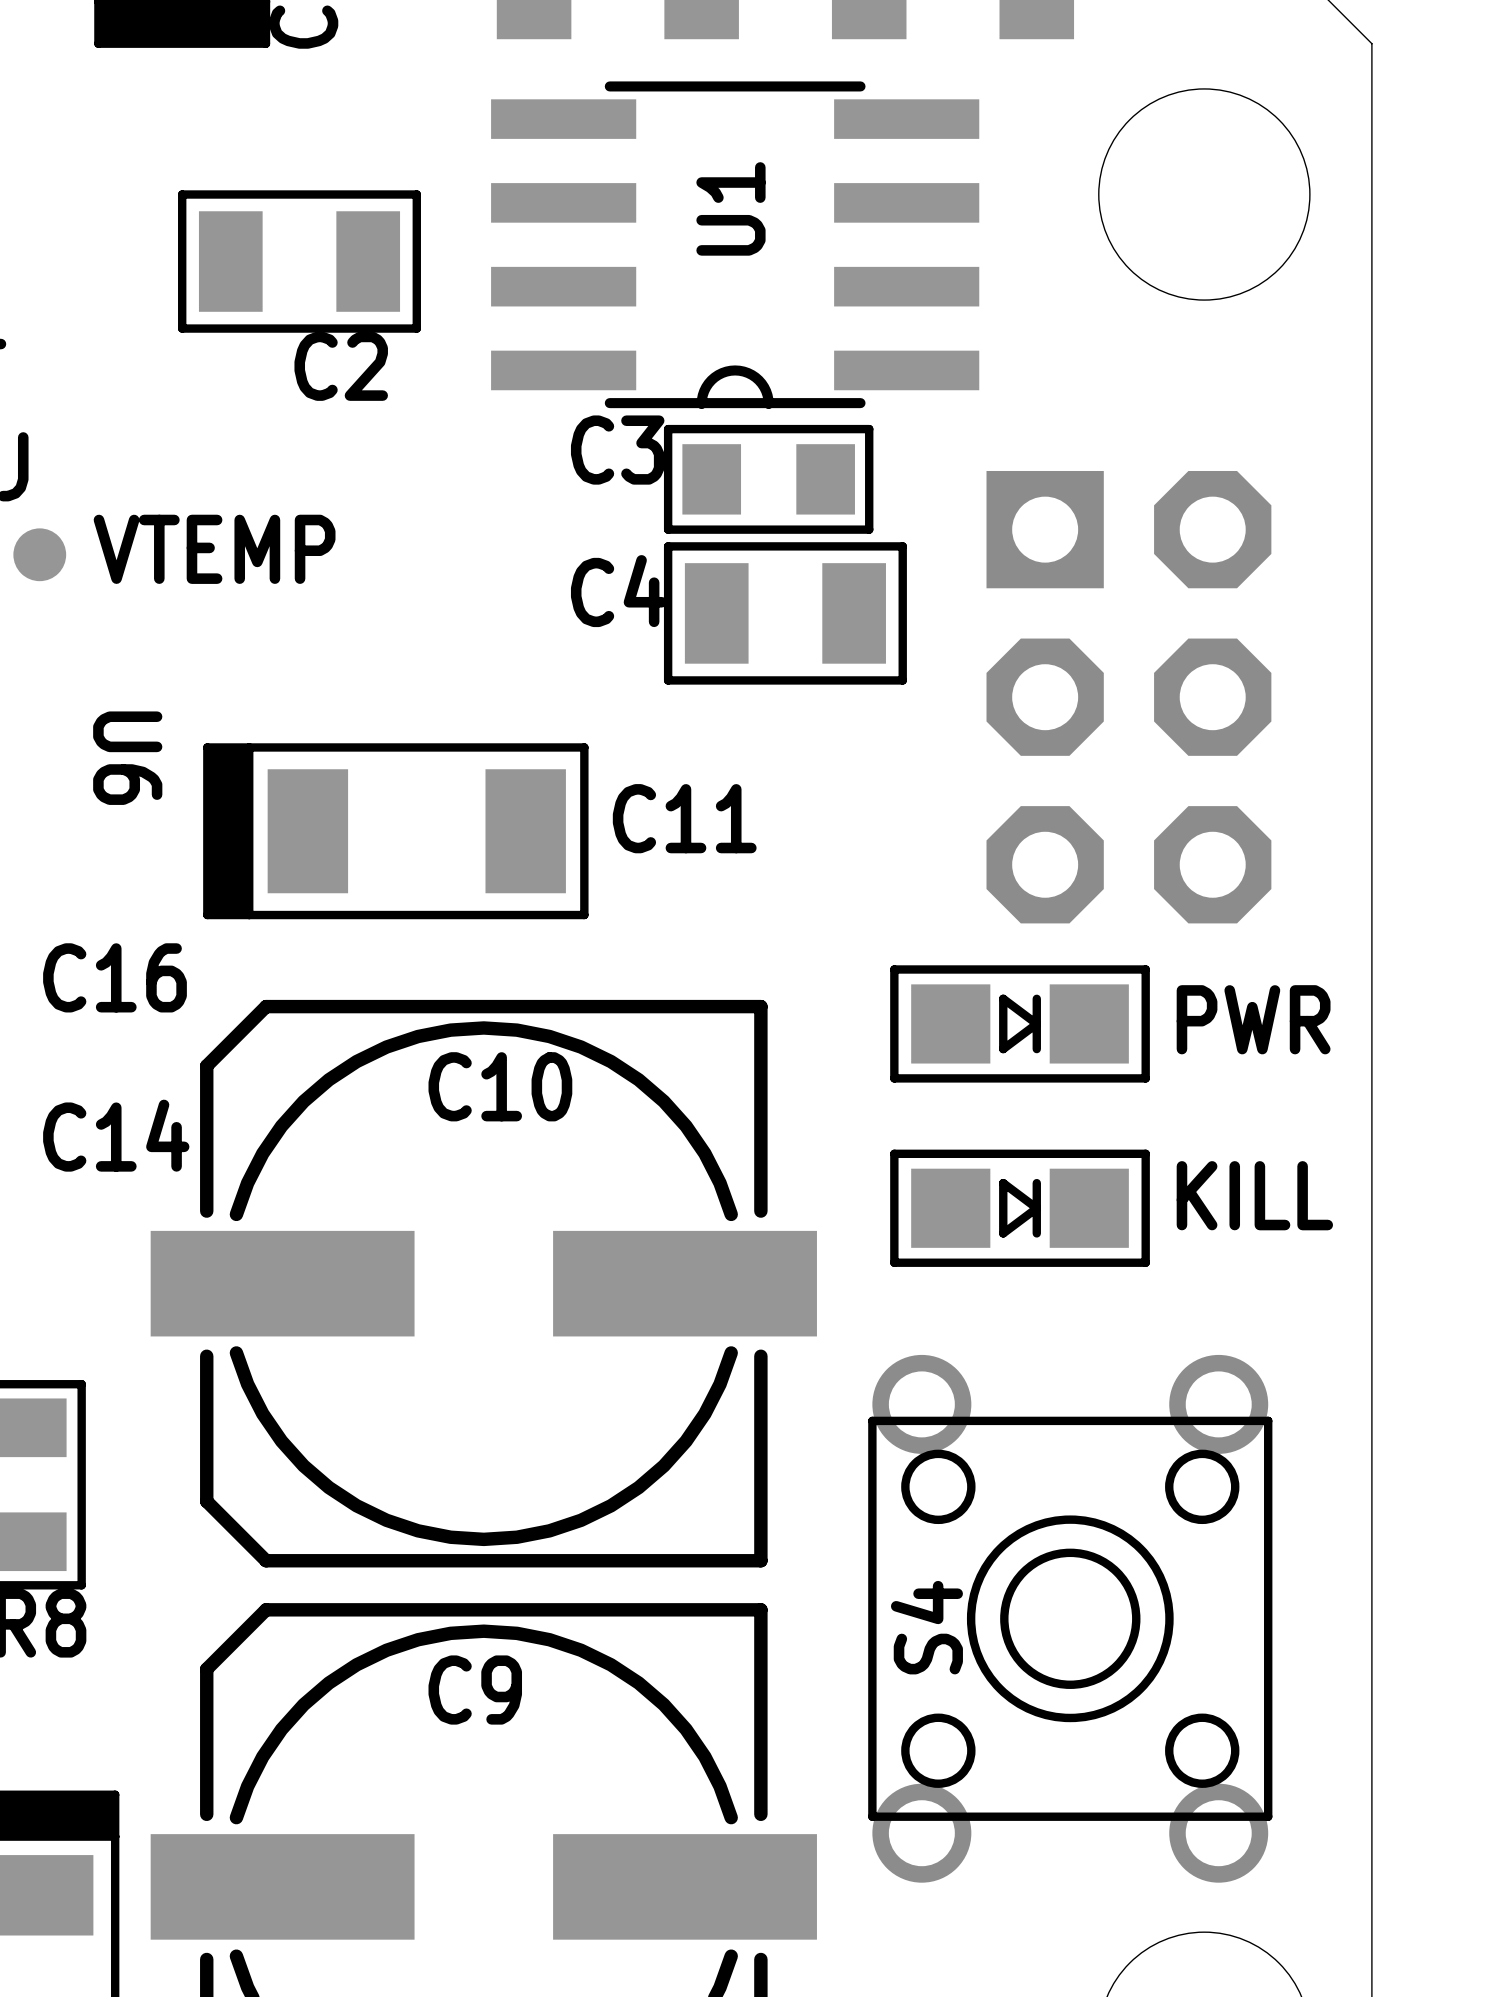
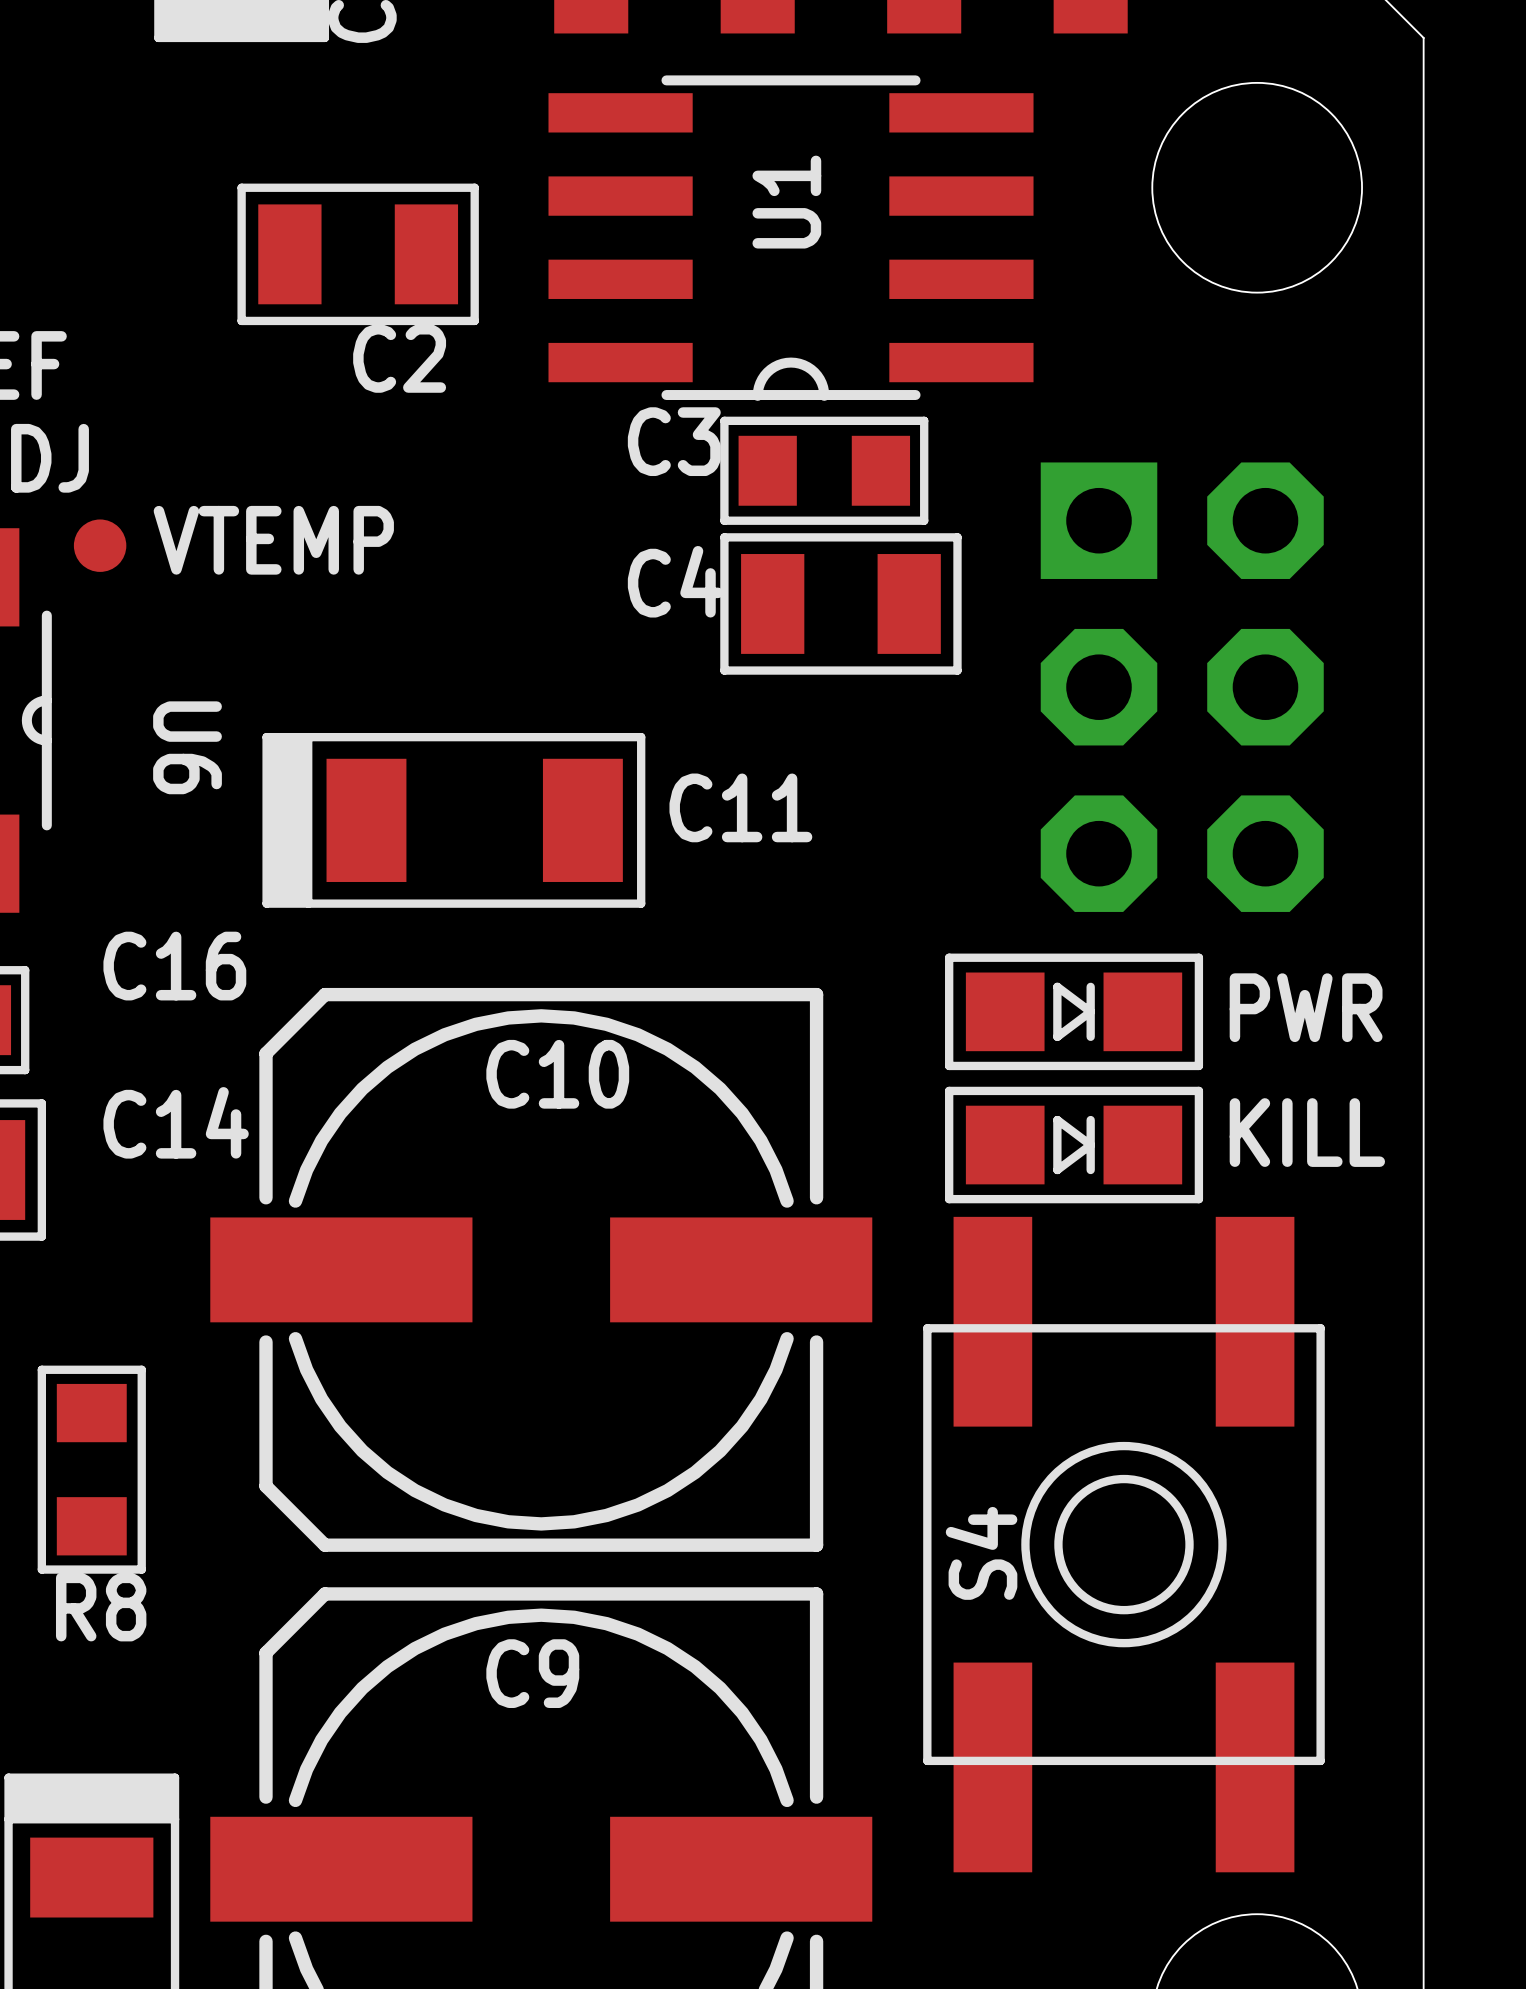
KILL position: (1020, 1208) -> (1074, 1145)
S4 footprint: [868, 1354, 1273, 1883] -> [923, 1216, 1325, 1873]

